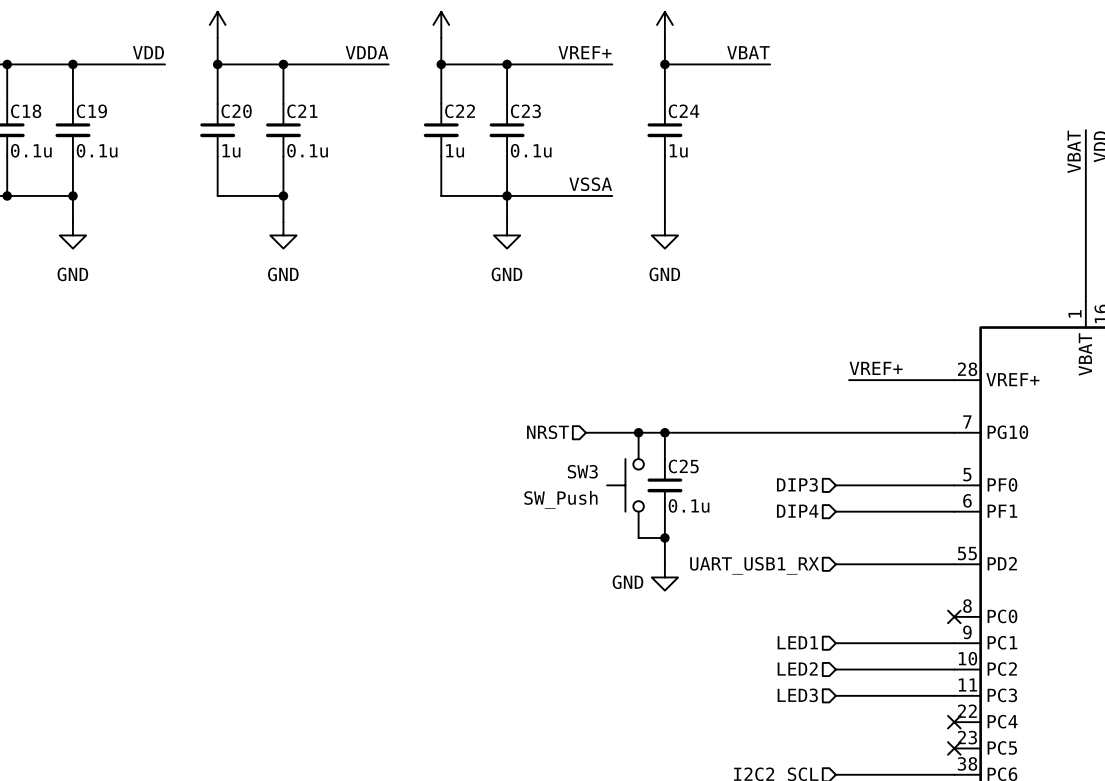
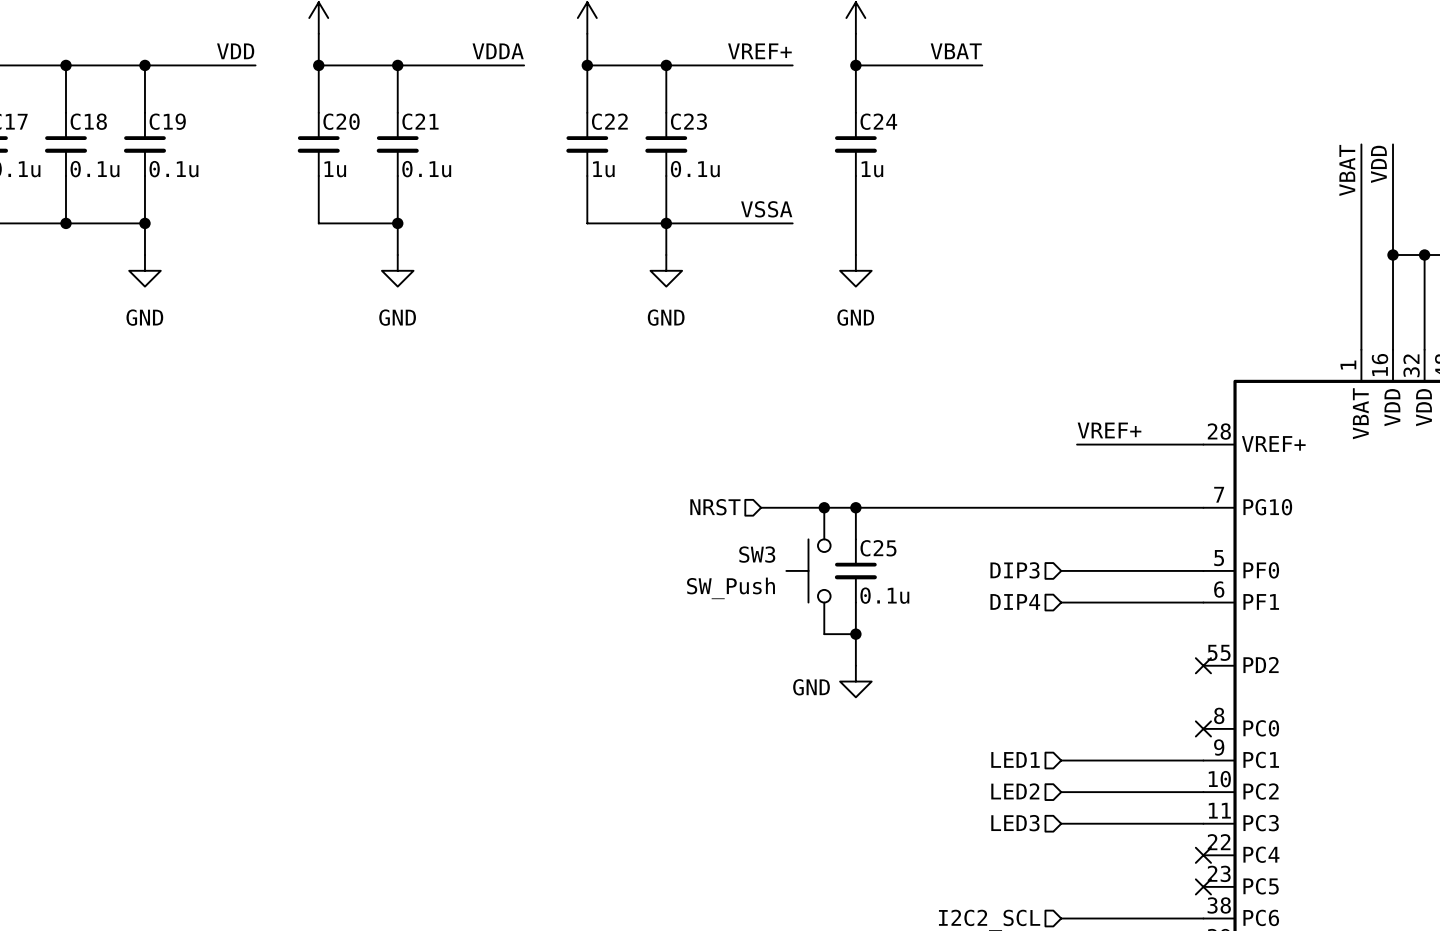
wire: (835, 564) (954, 564) -> none
no-connect mark: none -> (1203, 665)
hierarchical label: UART_USB1_RX (754, 565) -> none

